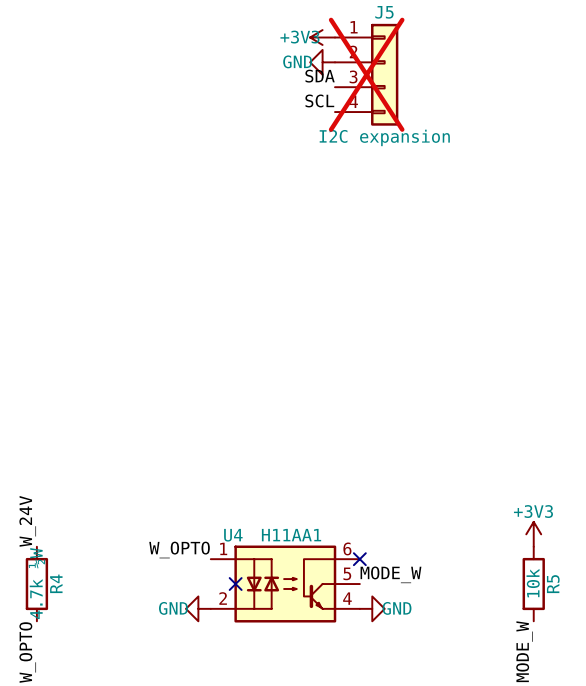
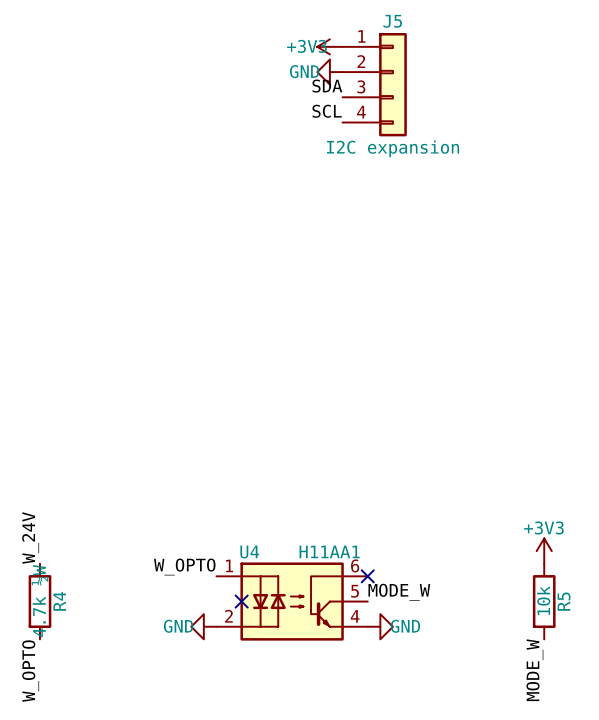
J5 do-not-place cross: (366, 74) -> none
U4 name position: U4 (233, 535) -> U4 (249, 552)
U4 value position: H11AA1 (291, 535) -> H11AA1 (329, 551)

